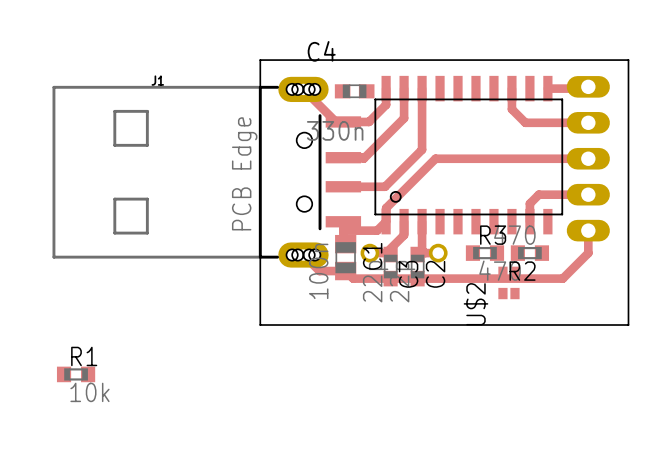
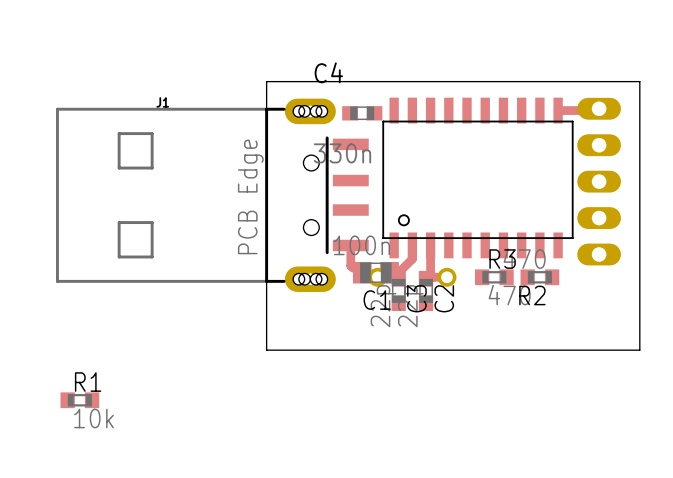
track: (386, 88) (386, 104) (368, 121) (336, 121) (303, 89) (303, 93) -> none
track: (404, 88) (404, 118) (363, 158) (343, 157) -> none
track: (422, 88) (422, 149) (385, 186) (343, 186) -> none
track: (511, 88) (511, 109) (525, 122) (588, 122) -> none
track: (588, 158) (435, 158) (386, 208) (386, 221) (377, 230) (343, 230) -> none
track: (588, 194) (538, 194) (529, 203) (529, 221) -> none
track: (588, 230) (588, 253) (562, 278) (353, 278) (345, 271) (319, 271) (303, 255) -> none
C1 rotation: 0° (345, 257) -> 90° clockwise (375, 272)
U$2: (508, 282) -> none

